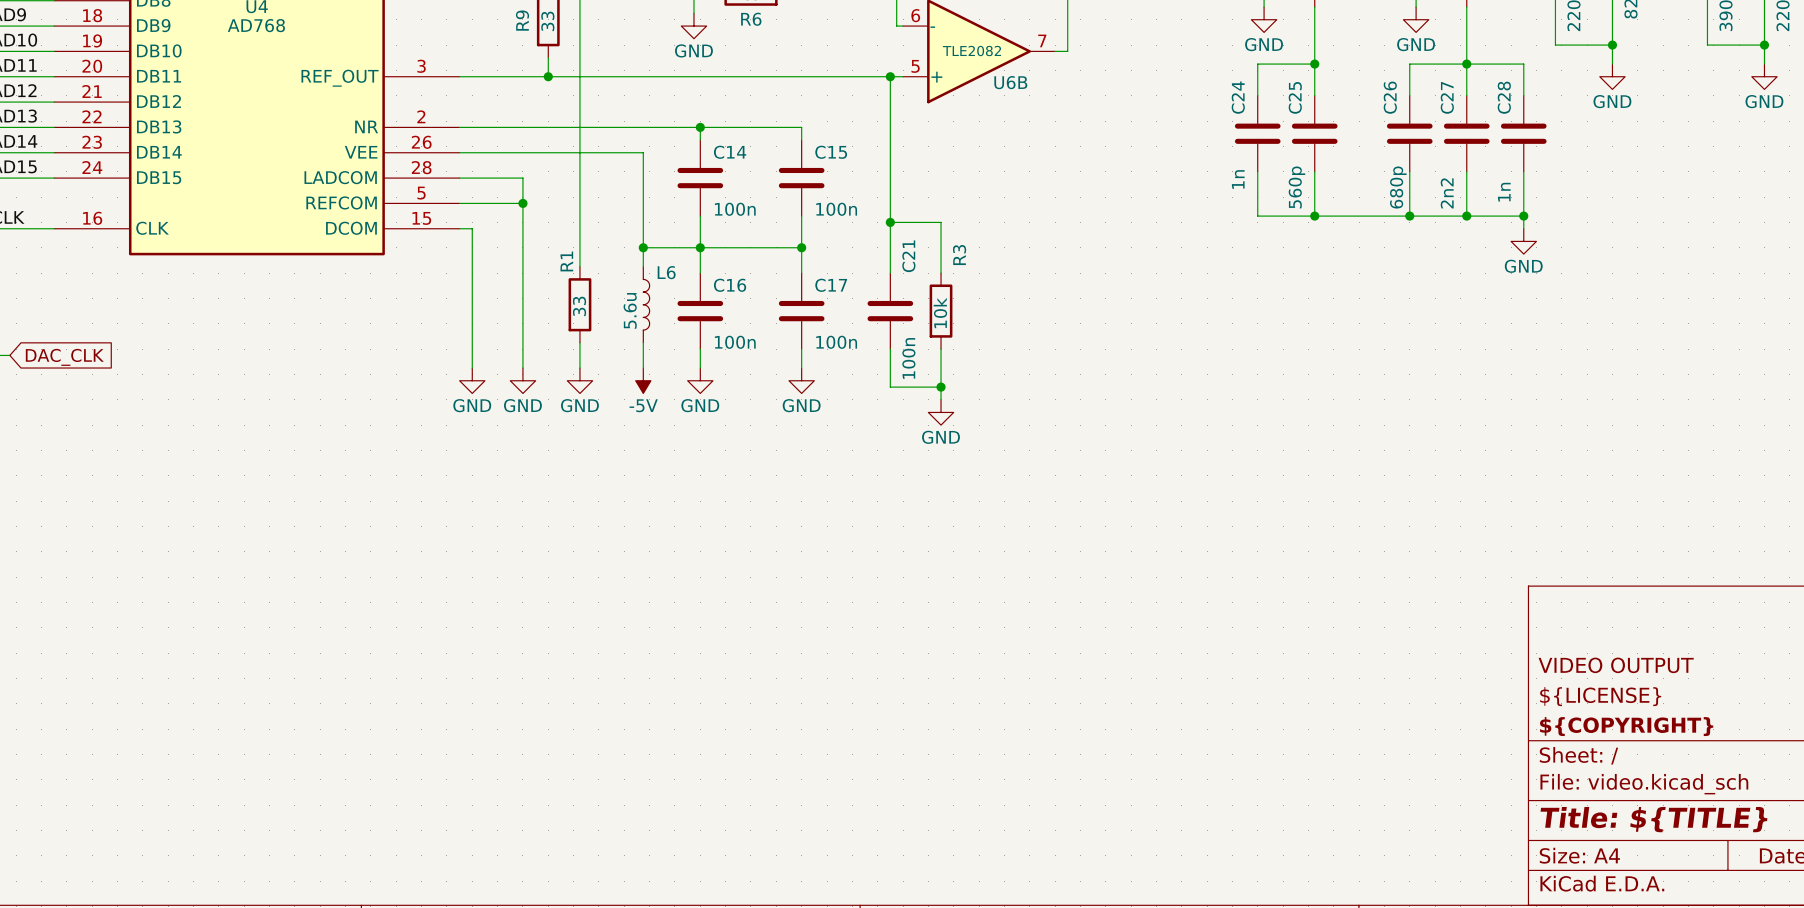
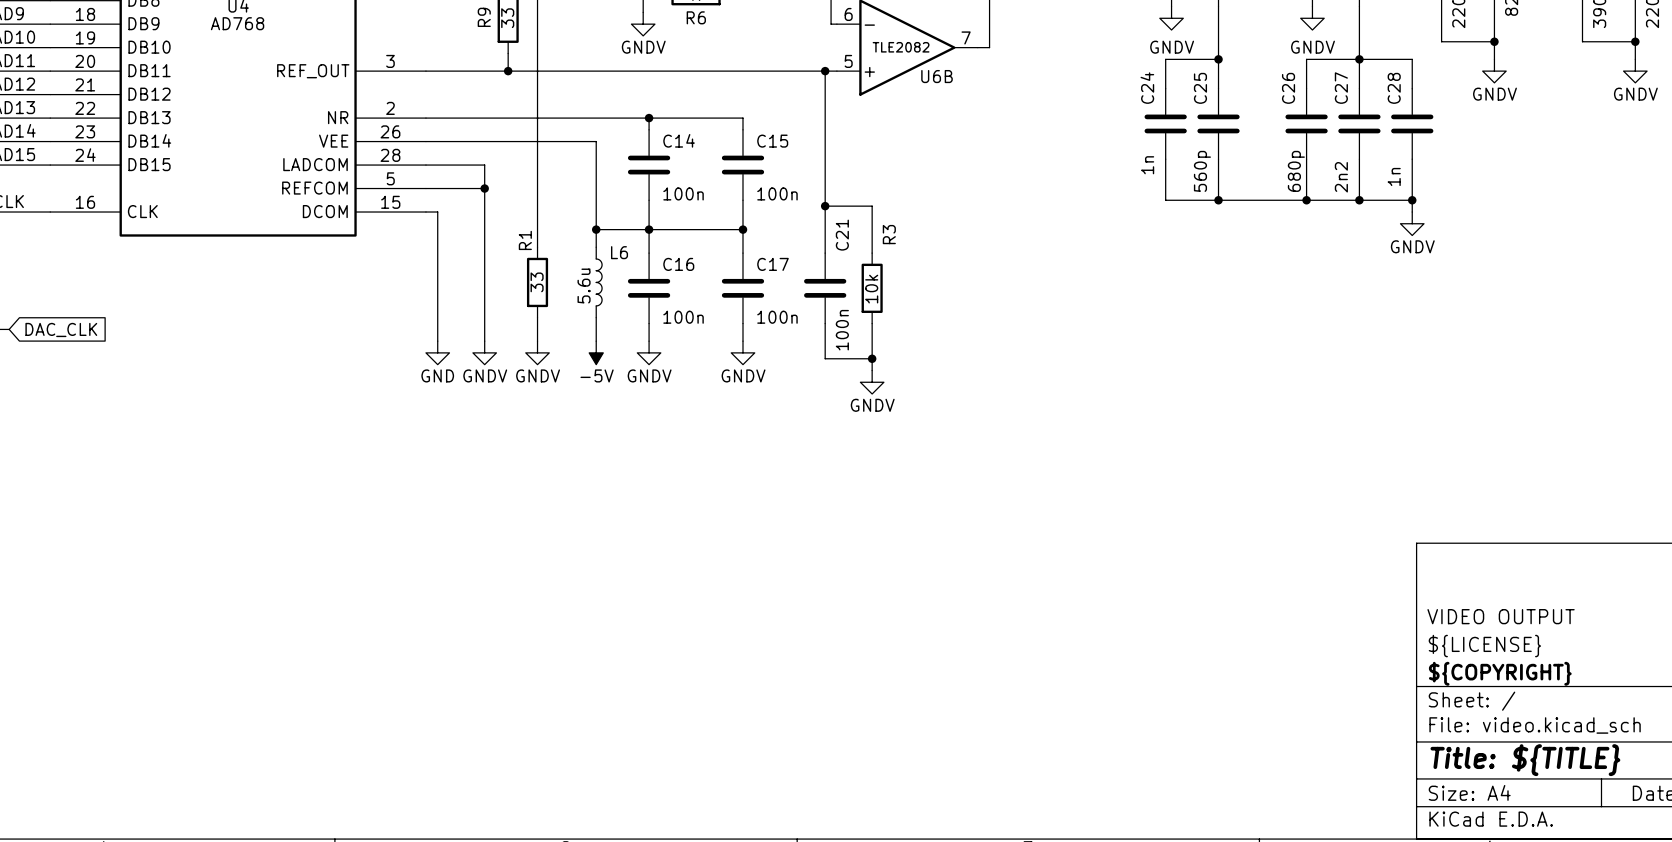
power symbol: GND (1264, 19) -> GNDV (1171, 18)
power symbol: GND (1416, 19) -> GNDV (1312, 18)
power symbol: GND (693, 26) -> GNDV (643, 24)
power symbol: GND (1612, 76) -> GNDV (1494, 71)
power symbol: GND (1764, 76) -> GNDV (1635, 71)
power symbol: GND (1523, 241) -> GNDV (1412, 223)
power symbol: GND (522, 380) -> GNDV (484, 352)
power symbol: GND (579, 380) -> GNDV (537, 352)
power symbol: GND (700, 380) -> GNDV (649, 352)
power symbol: GND (801, 380) -> GNDV (742, 352)
power symbol: GND (941, 412) -> GNDV (872, 382)

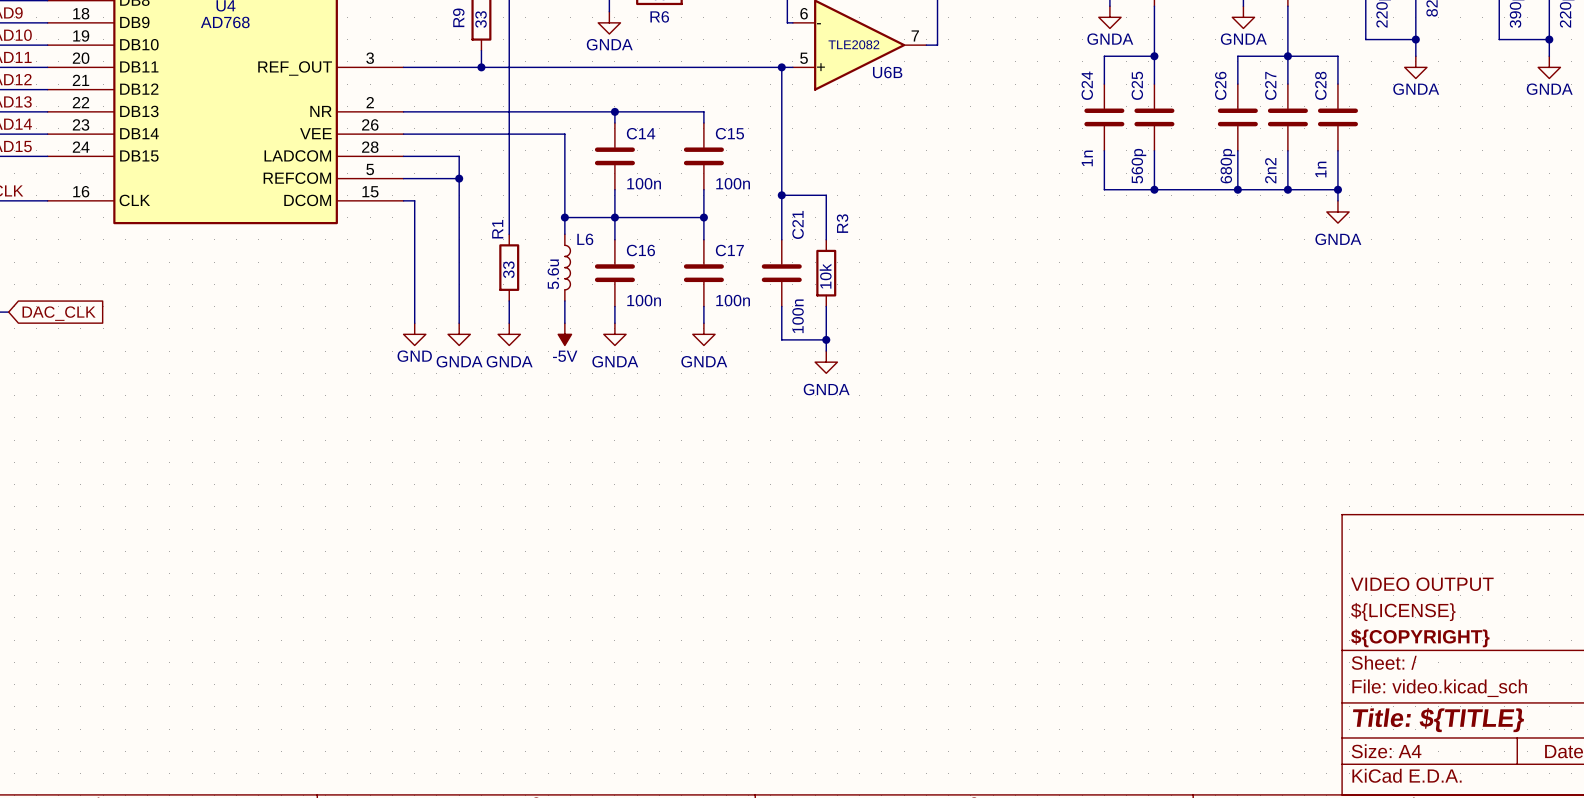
power symbol: GNDV (1171, 18) -> GNDA (1109, 17)
power symbol: GNDV (1312, 18) -> GNDA (1243, 17)
power symbol: GNDV (643, 24) -> GNDA (609, 22)
power symbol: GNDV (1494, 71) -> GNDA (1415, 67)
power symbol: GNDV (1635, 71) -> GNDA (1549, 67)
power symbol: GNDV (1412, 223) -> GNDA (1337, 211)
power symbol: GNDV (484, 352) -> GNDA (459, 334)
power symbol: GNDV (537, 352) -> GNDA (509, 334)
power symbol: GNDV (649, 352) -> GNDA (614, 334)
power symbol: GNDV (742, 352) -> GNDA (703, 334)
power symbol: GNDV (872, 382) -> GNDA (826, 362)

